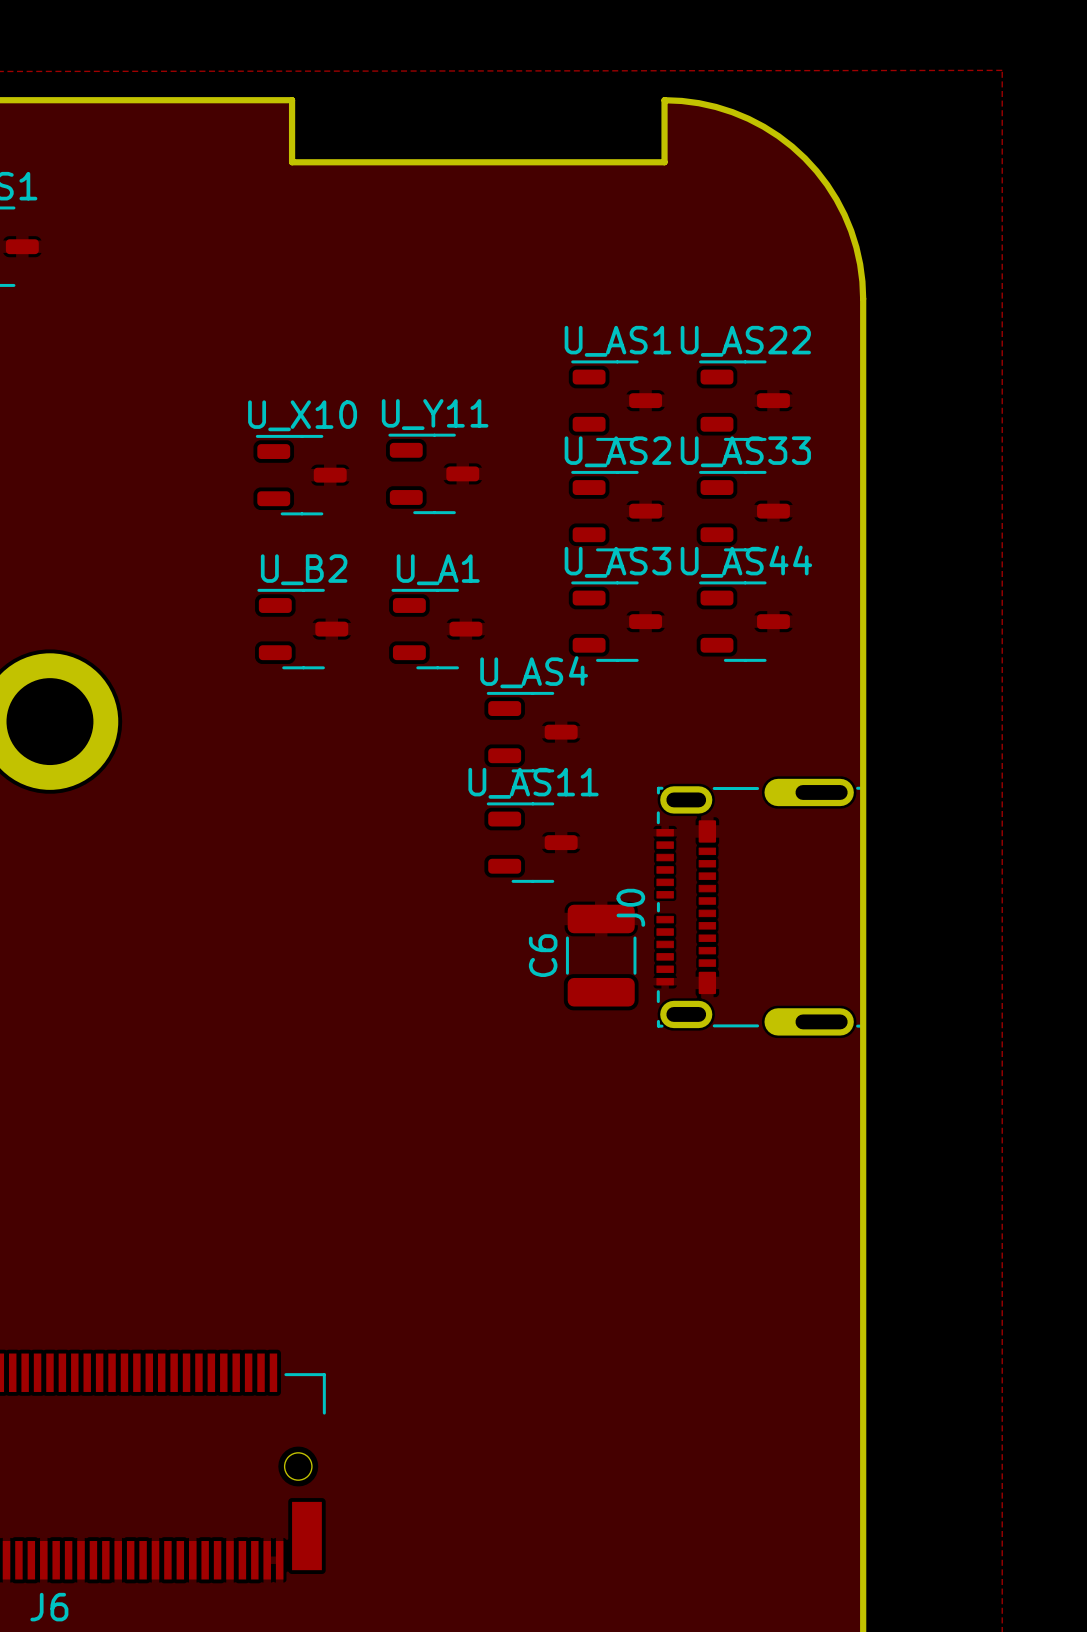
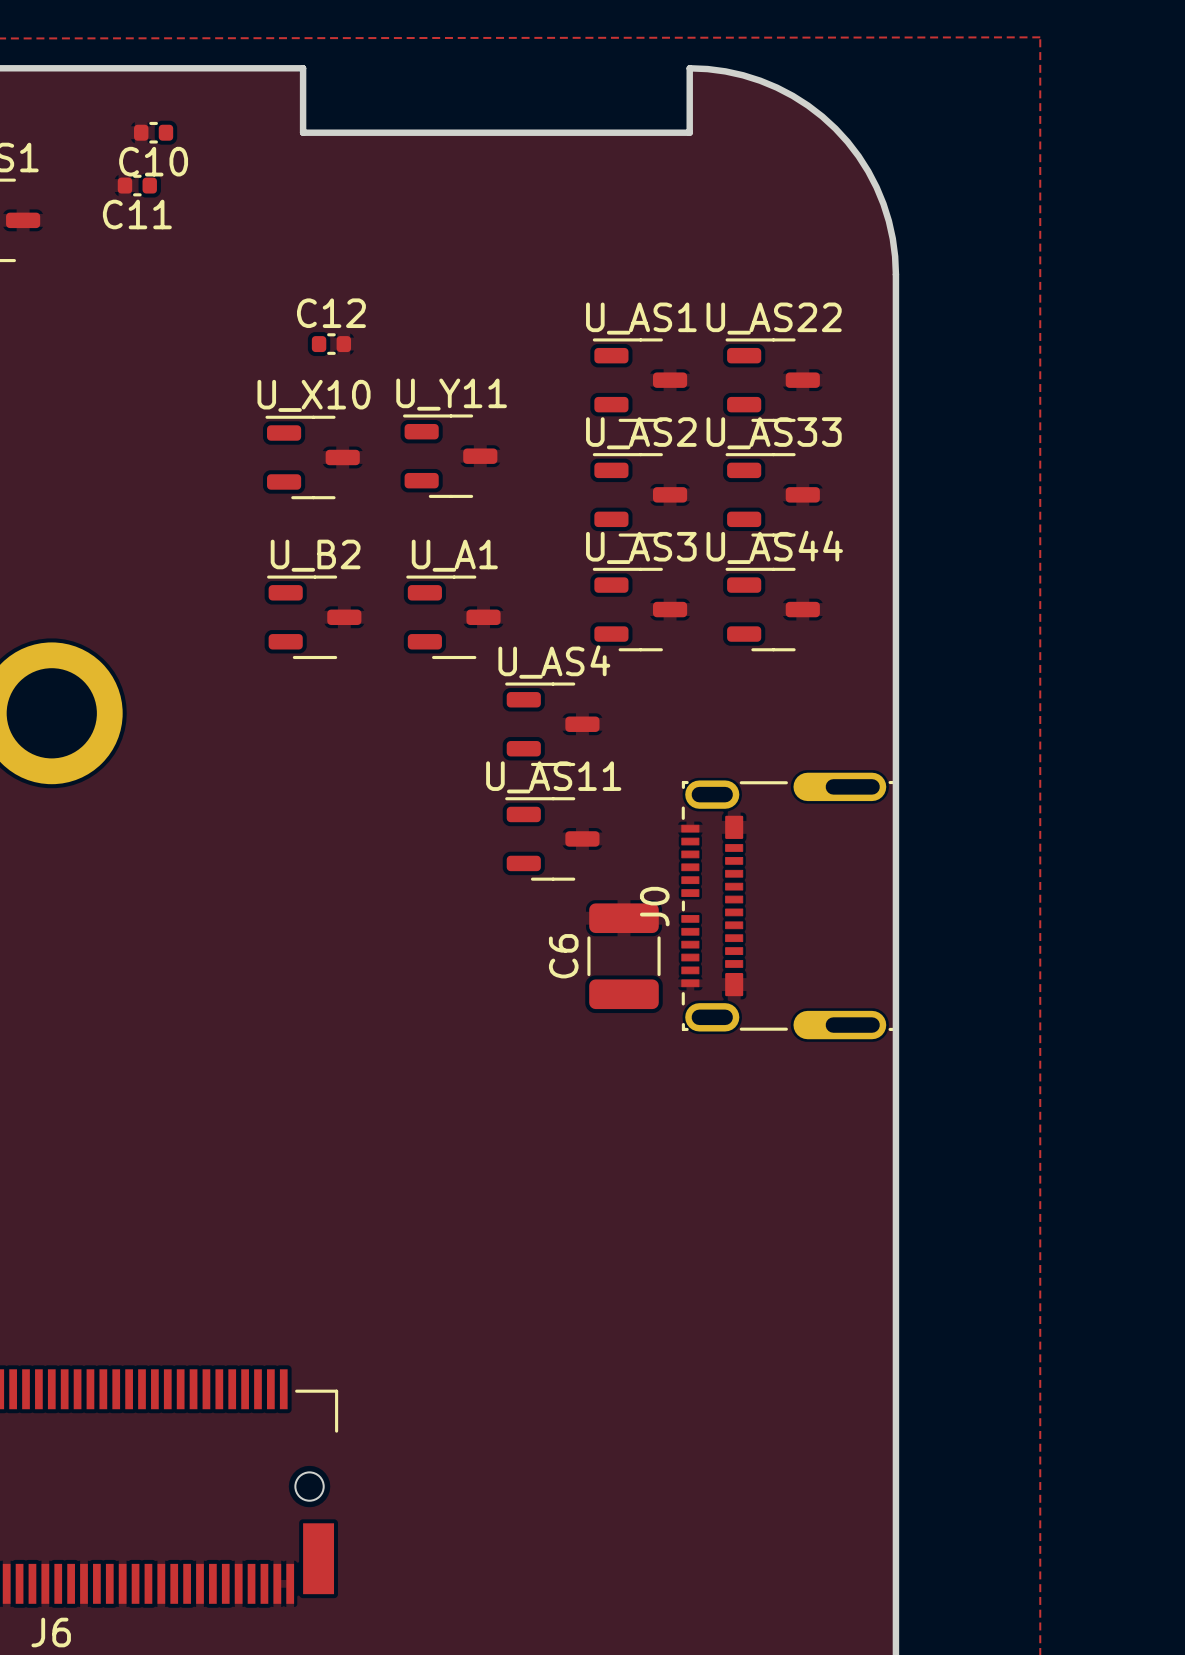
C10: none -> (153, 132)
C11: none -> (137, 185)
C12: none -> (331, 344)

